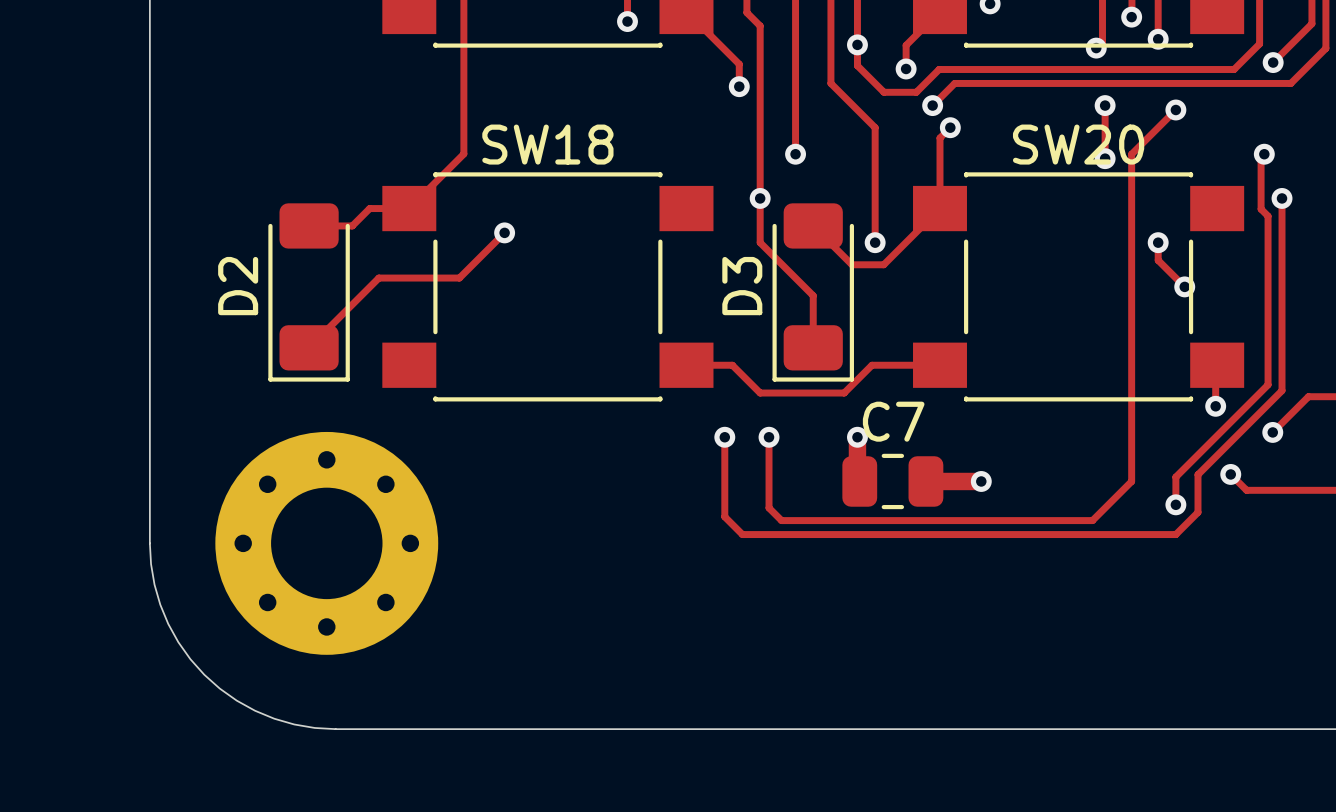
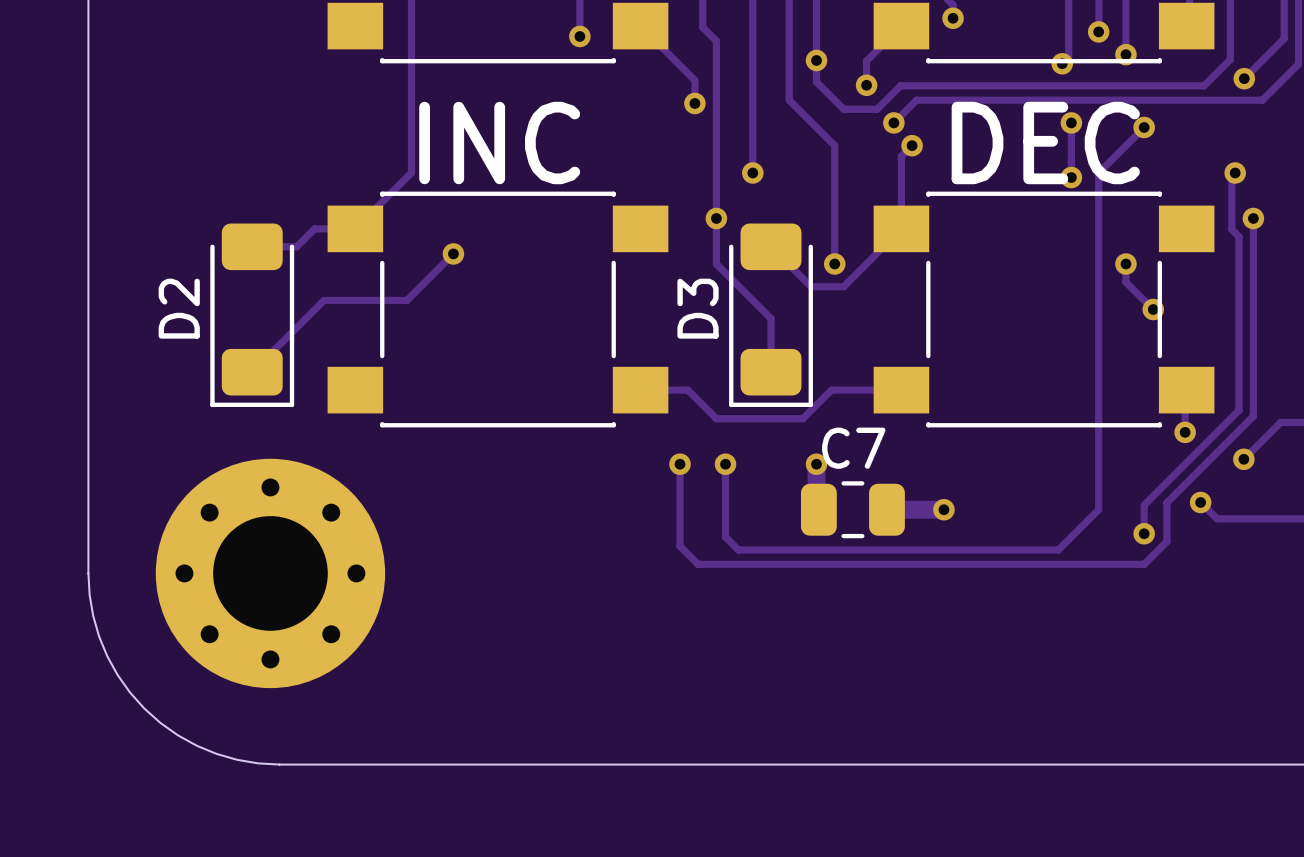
SW18 value: none -> INC (499, 143)
SW20 value: none -> DEC (1045, 143)
SW18 name: SW18 (547, 144) -> none
SW20 name: SW20 (1078, 144) -> none

